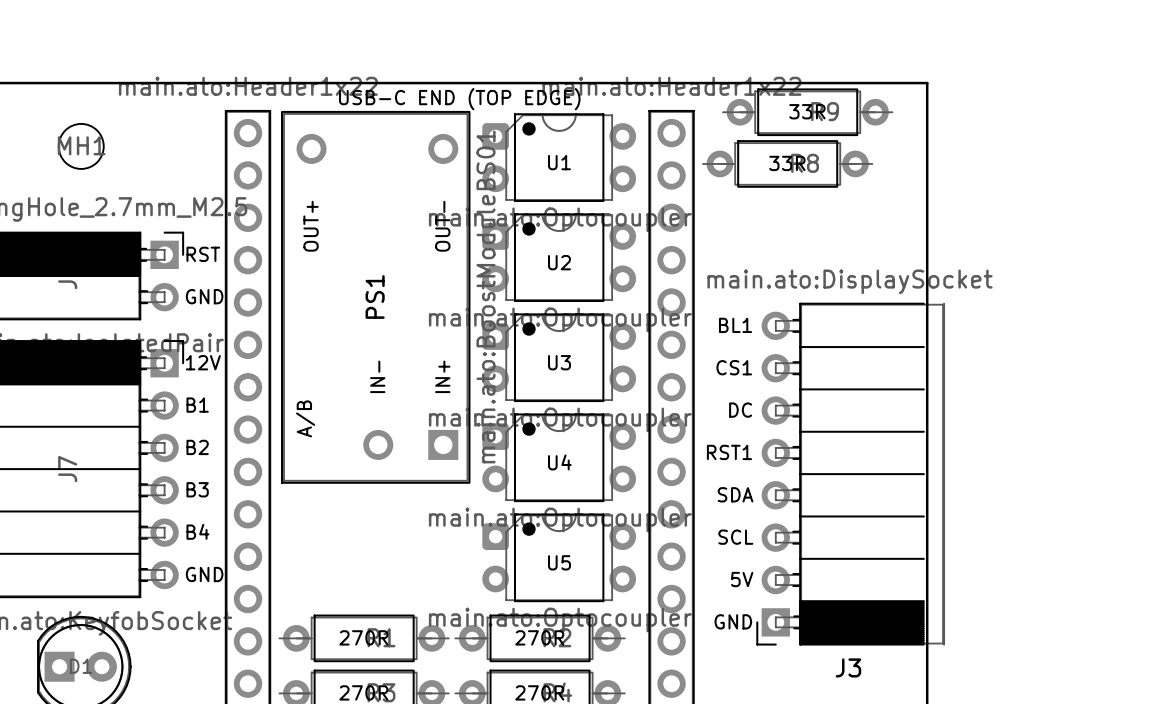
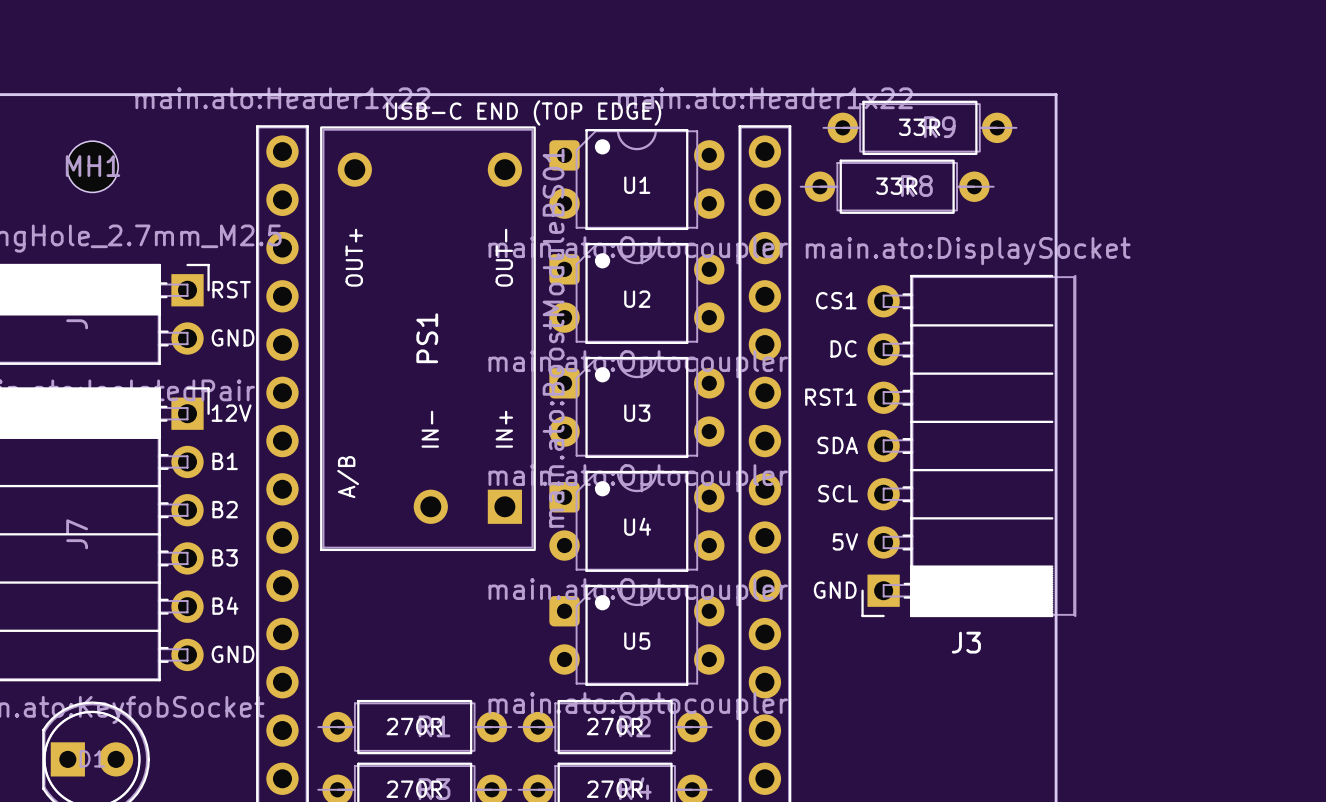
J3 footprint: [756, 302, 946, 646] -> [861, 274, 1077, 618]
text: BL1 (735, 325) -> none
text position: CS1 (734, 367) -> CS1 (836, 300)
text position: DC (740, 410) -> DC (843, 348)
text position: RST1 (729, 452) -> RST1 (830, 397)
text position: SDA (735, 494) -> SDA (837, 445)
text position: SCL (735, 537) -> SCL (838, 493)
text position: 5V (742, 579) -> 5V (845, 541)
text position: GND (733, 621) -> GND (835, 590)

